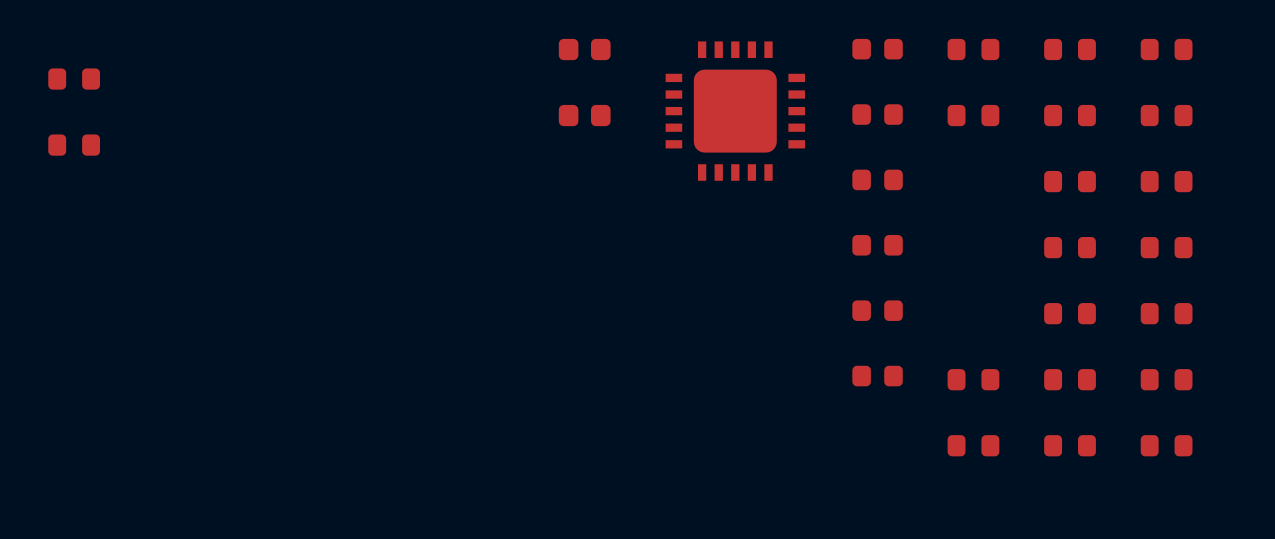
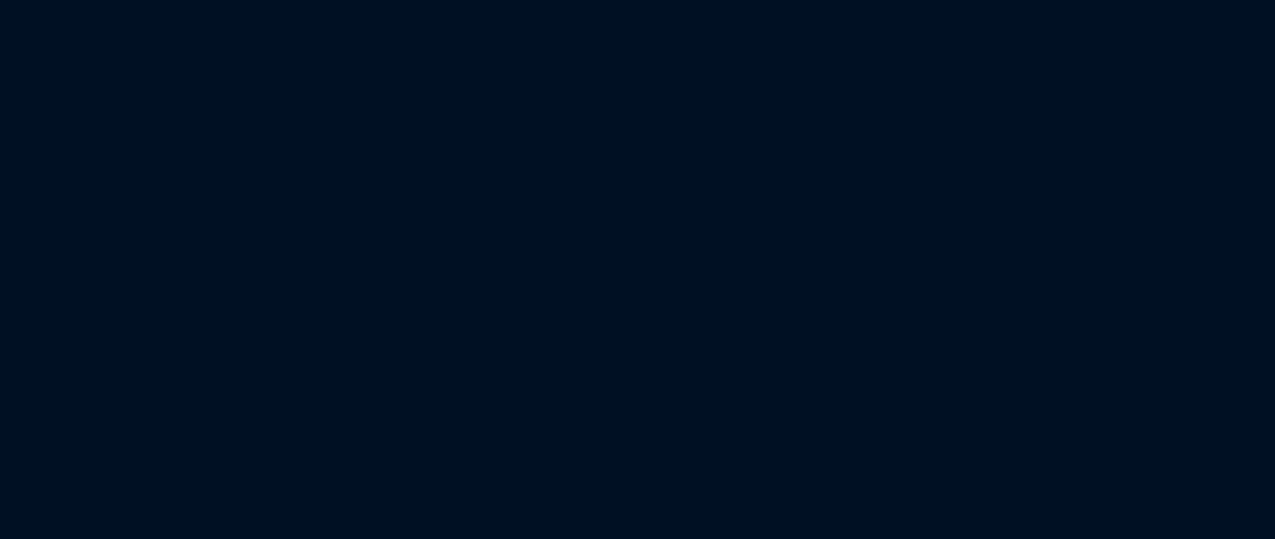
part: (584, 49) -> none
part: (877, 49) -> none
part: (973, 49) -> none
part: (1070, 49) -> none
part: (1166, 49) -> none
part: (74, 79) -> none
part: (735, 111) -> none
part: (877, 114) -> none
part: (584, 115) -> none
part: (973, 115) -> none
part: (1070, 115) -> none
part: (1166, 115) -> none
part: (74, 145) -> none
part: (877, 179) -> none
part: (1070, 181) -> none
part: (1166, 181) -> none
part: (877, 245) -> none
part: (1070, 247) -> none
part: (1166, 247) -> none
part: (877, 310) -> none
part: (1070, 313) -> none
part: (1166, 313) -> none
part: (877, 376) -> none
part: (973, 379) -> none
part: (1070, 379) -> none
part: (1166, 379) -> none
part: (973, 445) -> none
part: (1070, 445) -> none
part: (1166, 445) -> none

